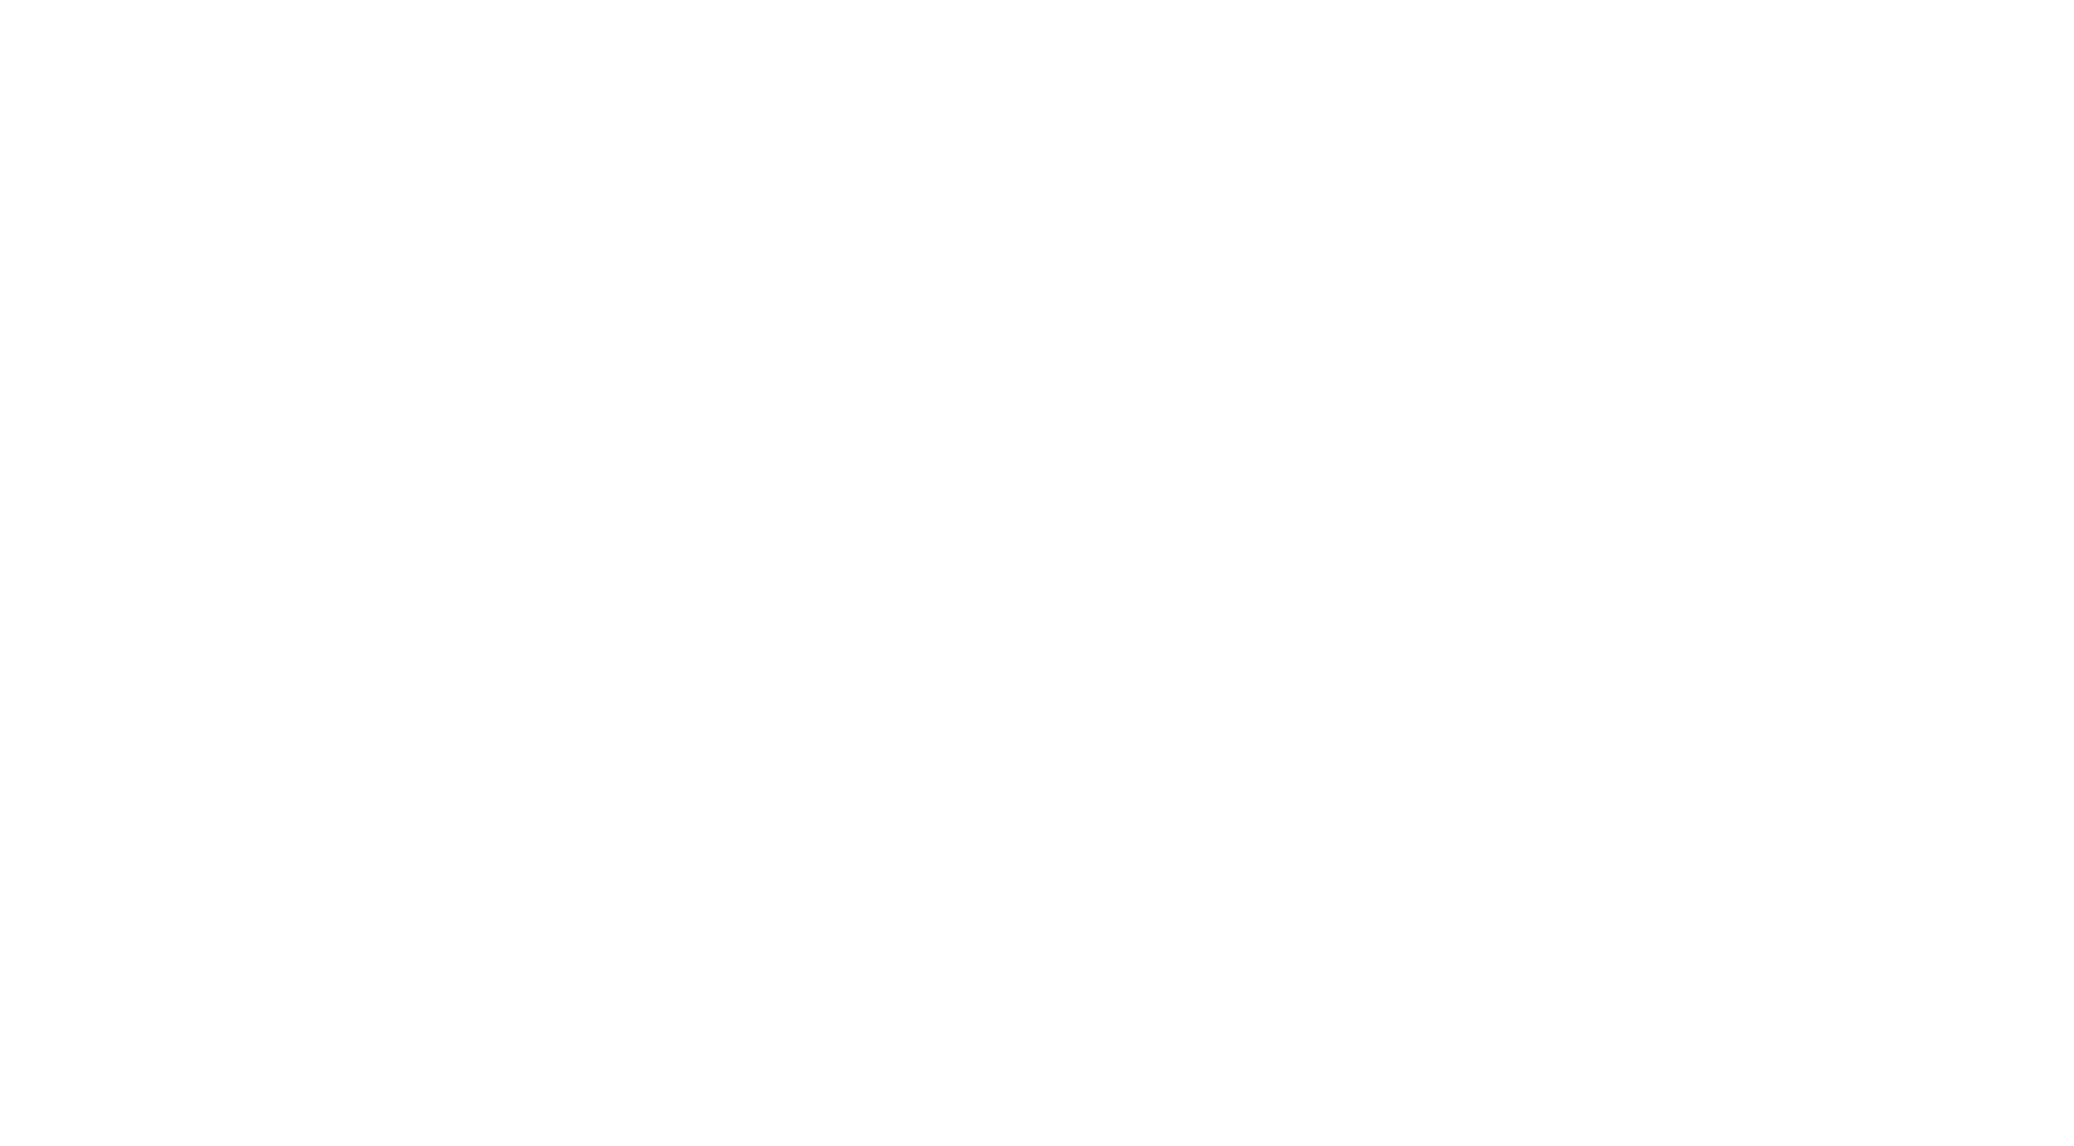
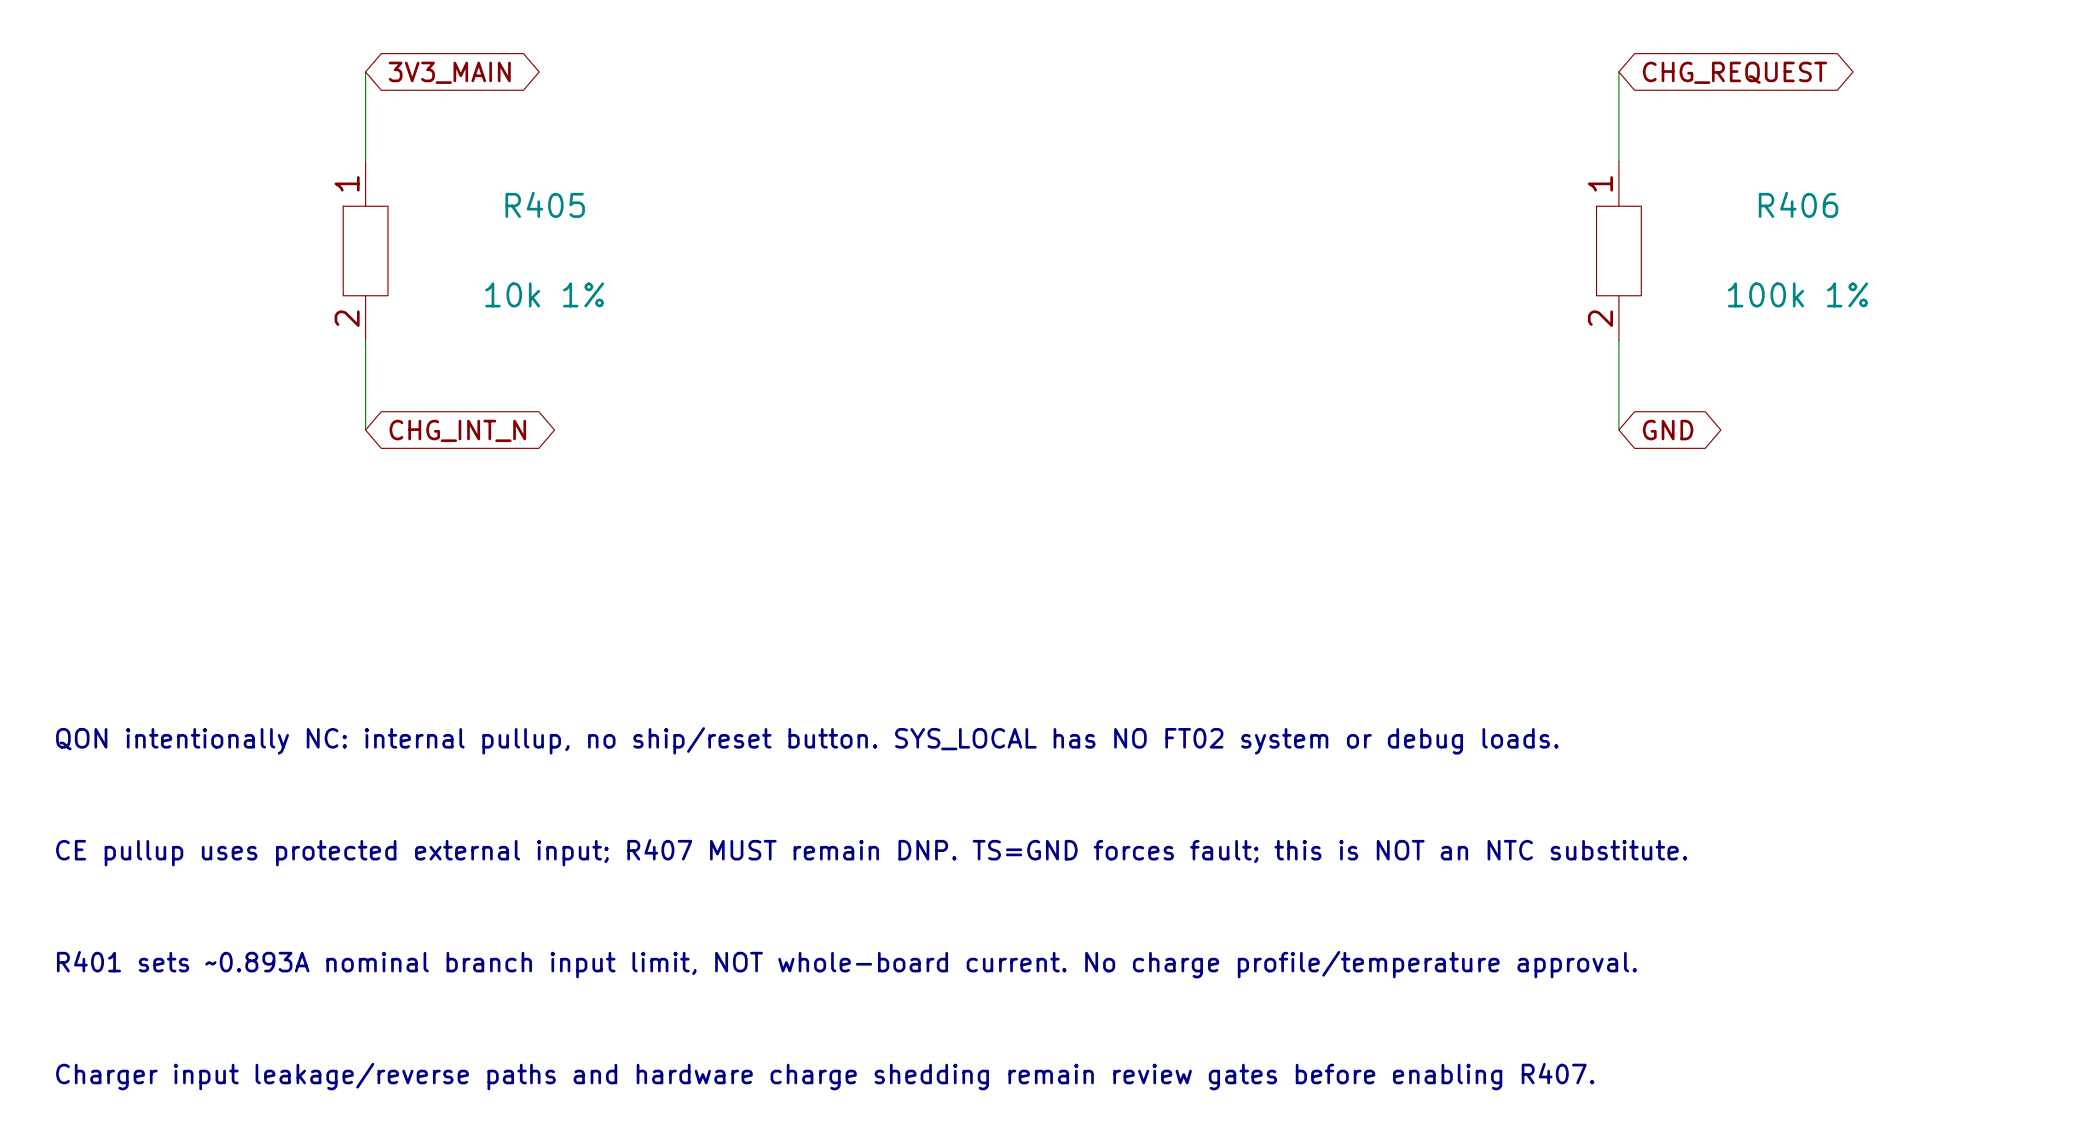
wire: none -> (365, 71) (365, 161)
wire: none -> (1618, 71) (1618, 161)
global label: none -> 3V3_MAIN (449, 72)
global label: none -> CHG_REQUEST (1735, 72)
R405: none -> 10k 1% (365, 250)
R406: none -> 100k 1% (1618, 250)
wire: none -> (365, 340) (365, 430)
wire: none -> (1618, 340) (1618, 430)
global label: none -> CHG_INT_N (457, 430)
global label: none -> GND (1668, 430)
text: none -> QON intentionally NC: internal pullup, no ship/reset button. SYS_LOCAL has NO FT02 system or debug loads. (807, 740)
text: none -> CE pullup uses protected external input; R407 MUST remain DNP. TS=GND forces fault; this is NOT an NTC substitute. (871, 852)
text: none -> R401 sets ~0.893A nominal branch input limit, NOT whole-board current. No charge profile/temperature approval. (846, 964)
text: none -> Charger input leakage/reverse paths and hardware charge shedding remain review gates before enabling R407. (825, 1076)

